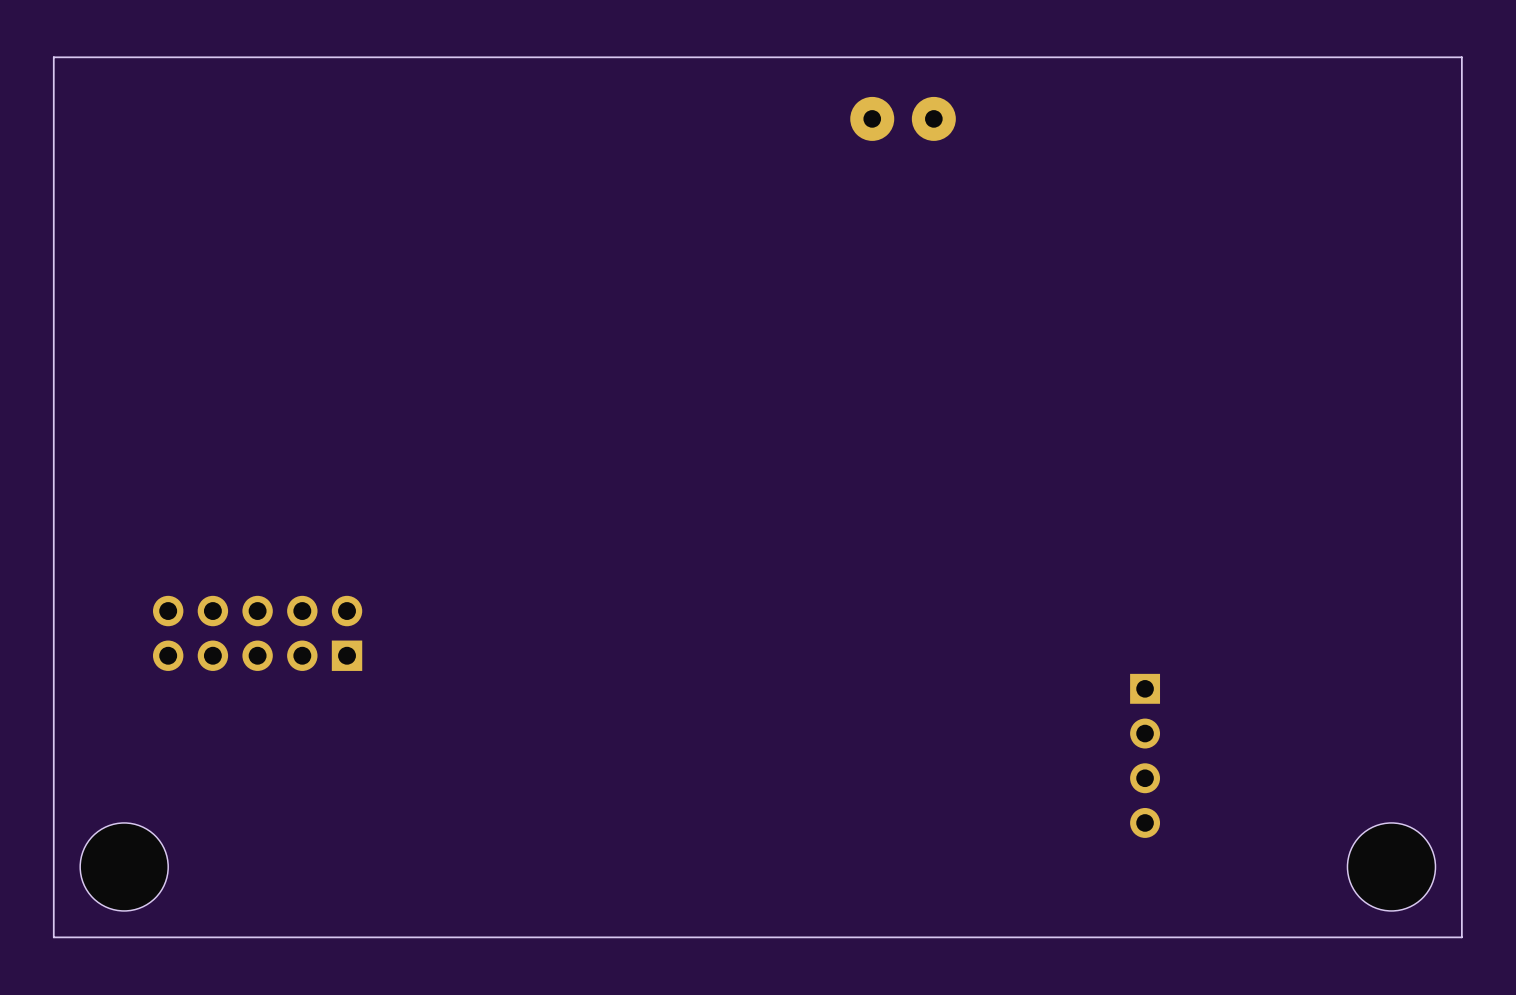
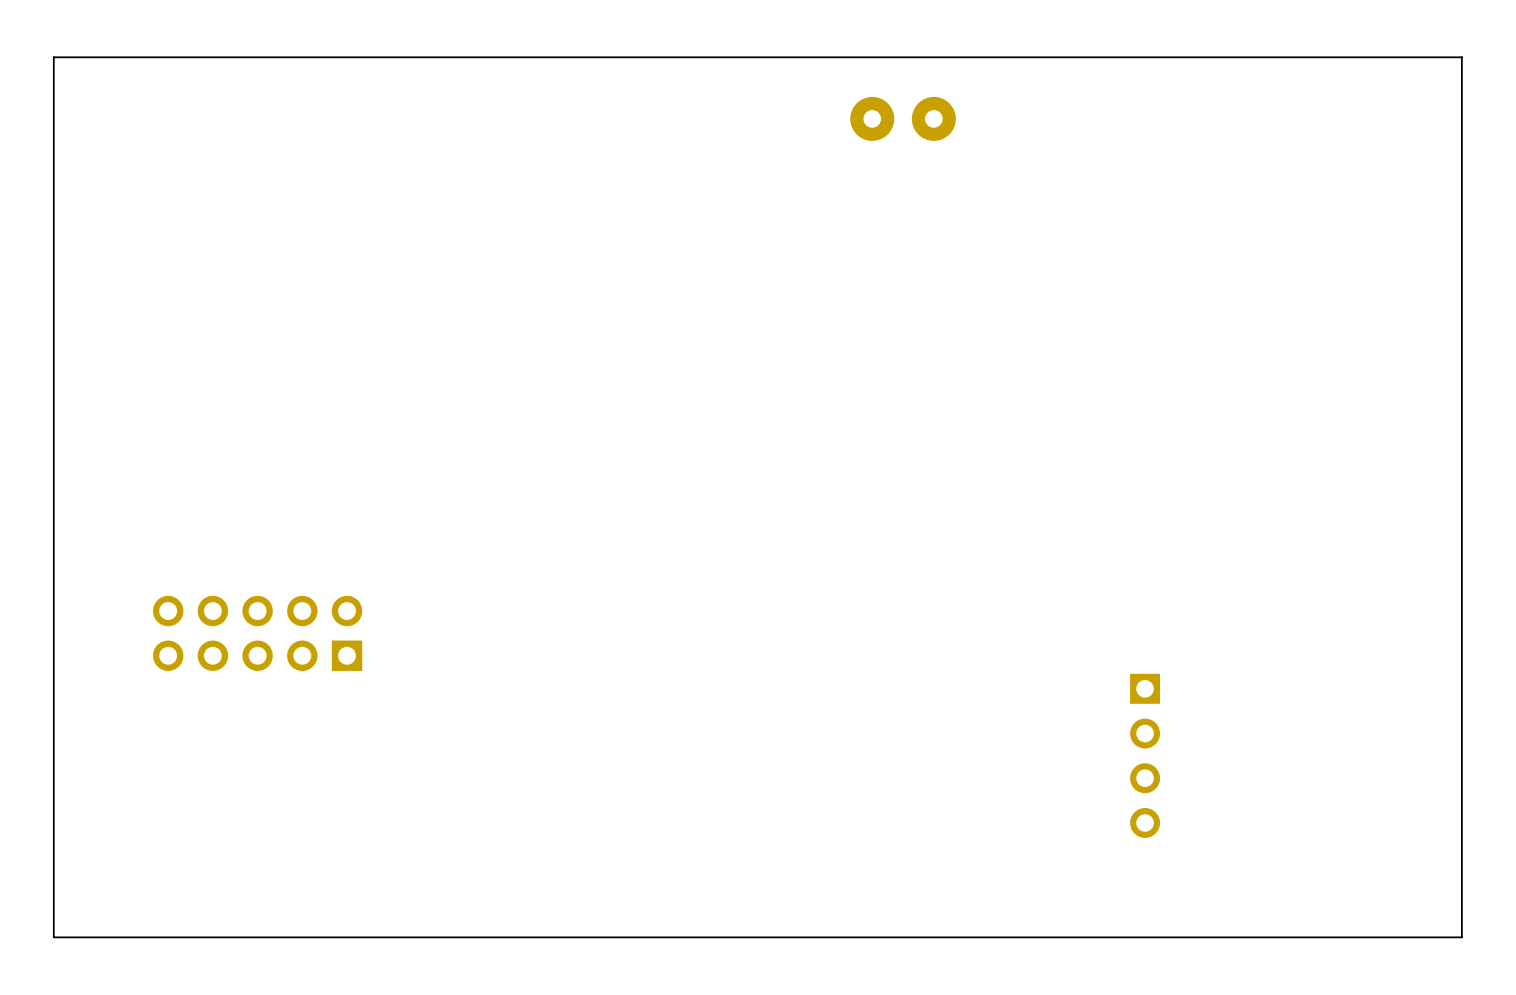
part: (124, 866) -> none
part: (1391, 866) -> none

